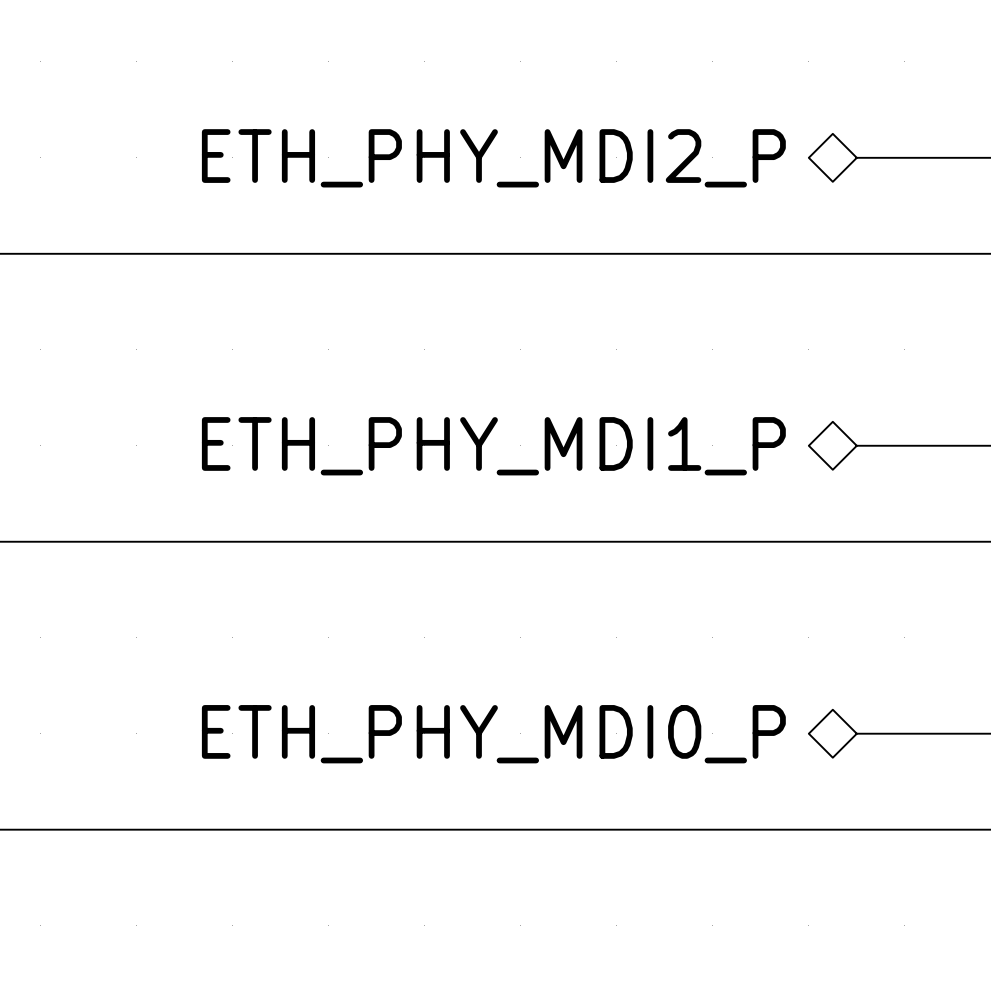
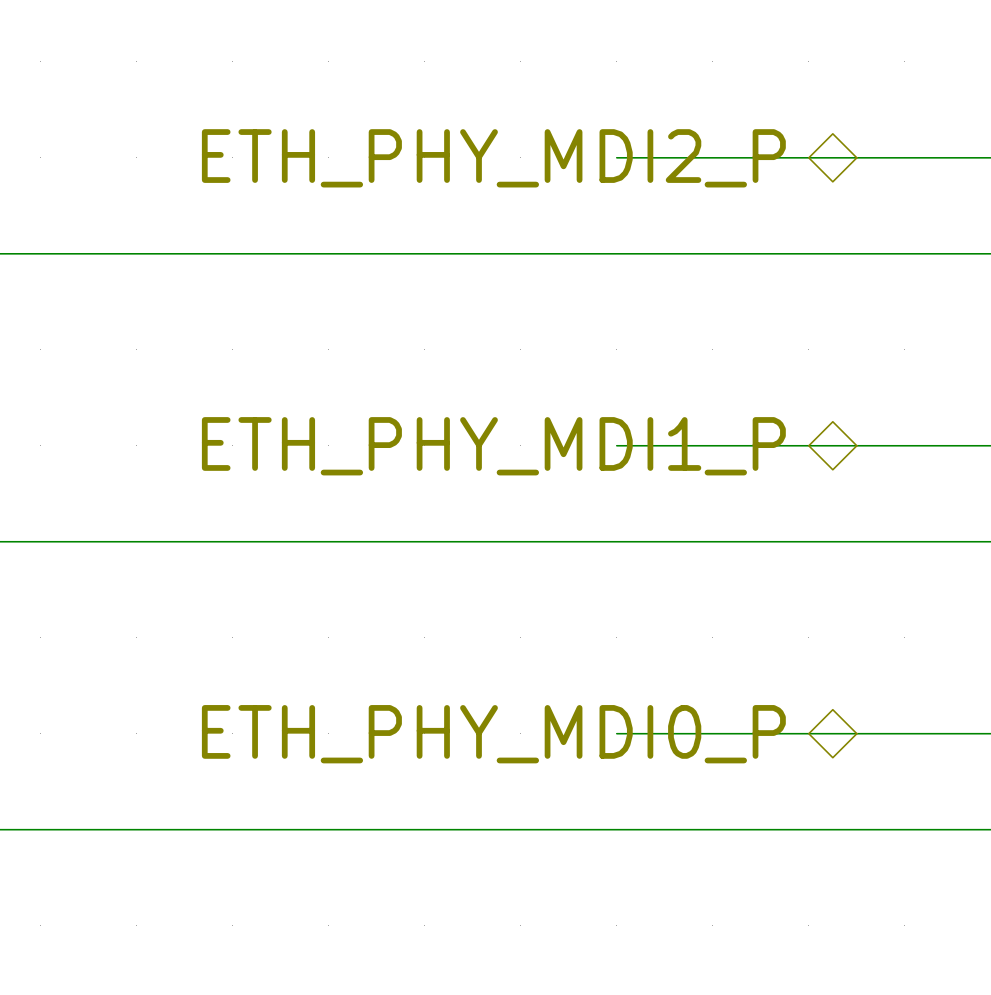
wire: none -> (616, 157) (856, 157)
wire: none -> (616, 445) (856, 445)
wire: none -> (616, 733) (856, 733)

